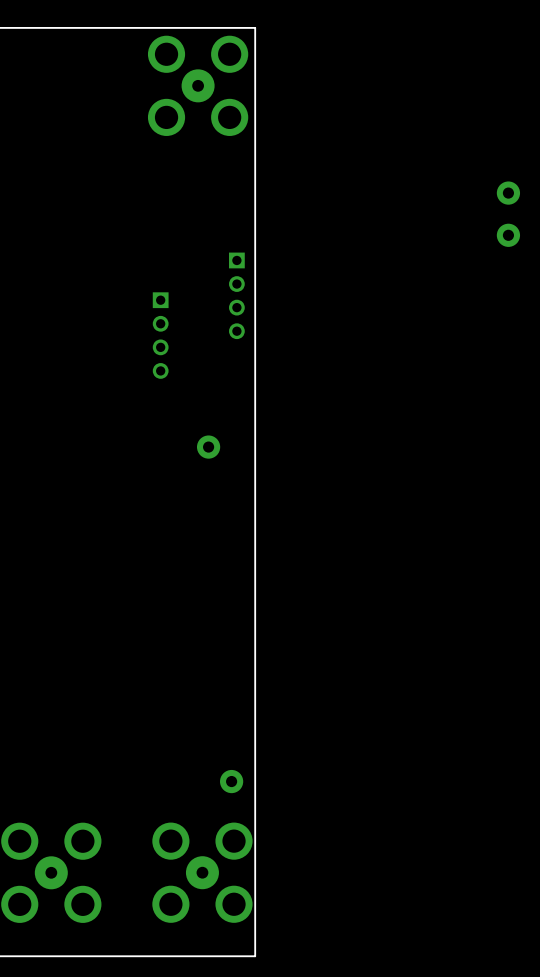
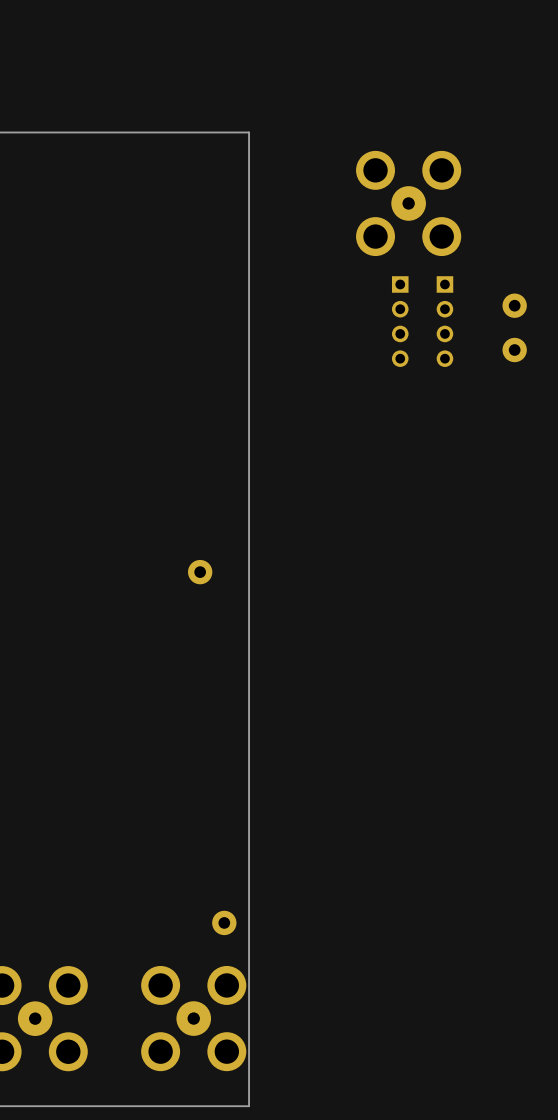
part position: (198, 85) -> (408, 203)
part: none -> (400, 321)
part: none -> (444, 321)
part: (236, 295) -> none
part: (160, 335) -> none

